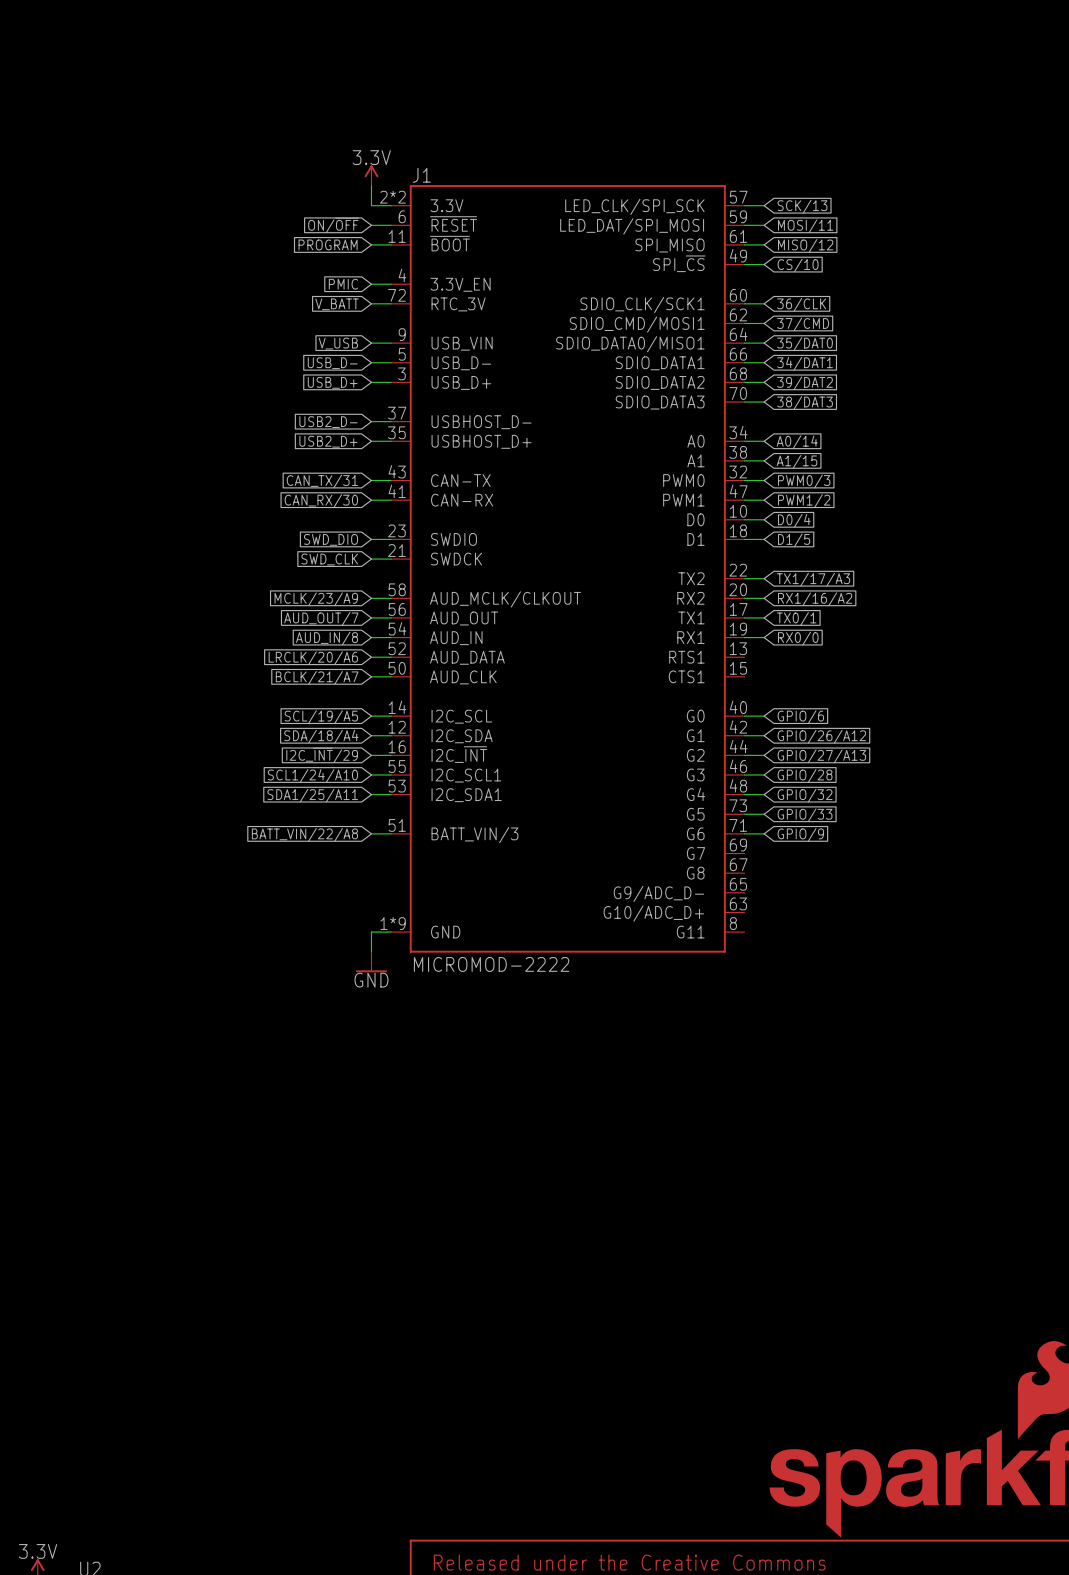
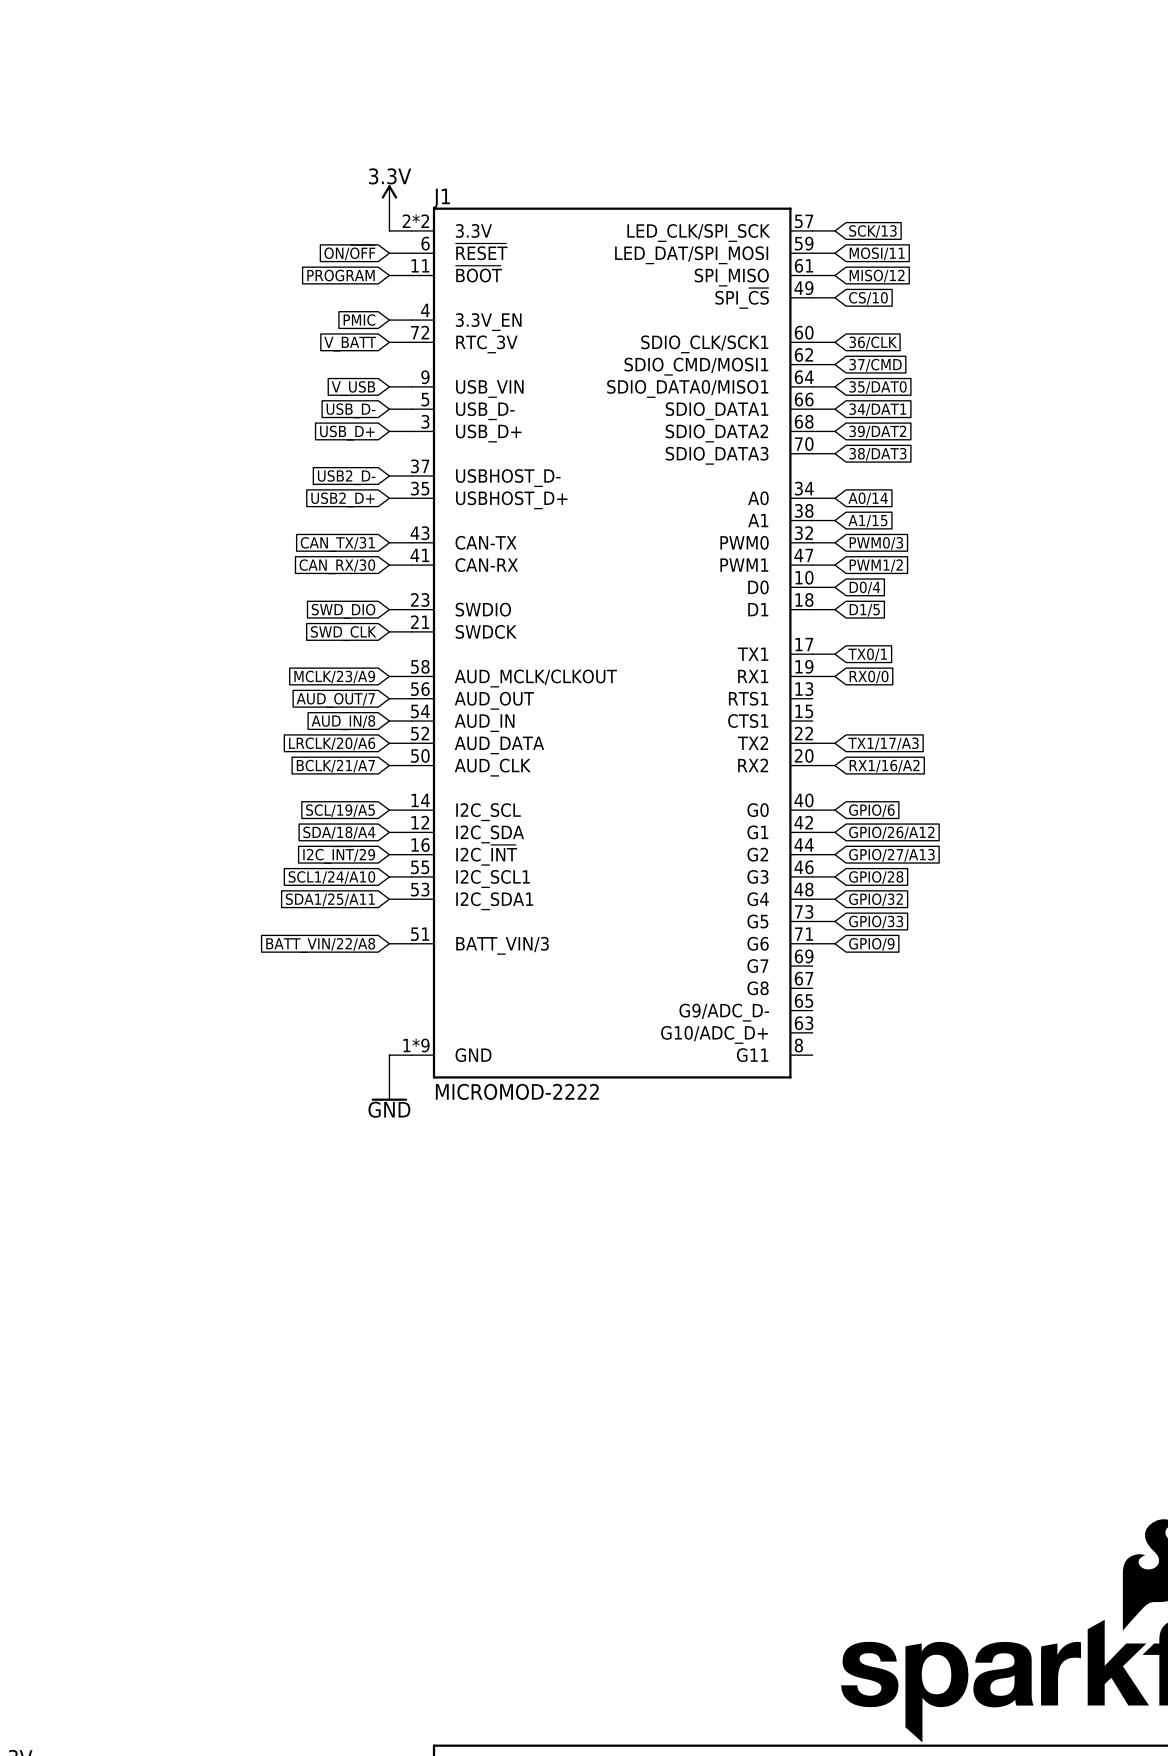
J1 symbol: [391, 185, 745, 953] -> [411, 207, 813, 1079]
global label: TX1/17/A3 (813, 579) -> TX0/1 (867, 654)
global label: RX1/16/A2 (815, 599) -> RX0/0 (869, 677)
wire: (744, 617) (764, 617) -> (812, 743) (834, 743)
global label: TX0/1 (796, 618) -> none
wire: (744, 637) (764, 637) -> (812, 765) (834, 765)
global label: RX0/0 (798, 638) -> none
global label: none -> TX1/17/A3 (883, 743)
global label: none -> RX1/16/A2 (884, 766)

